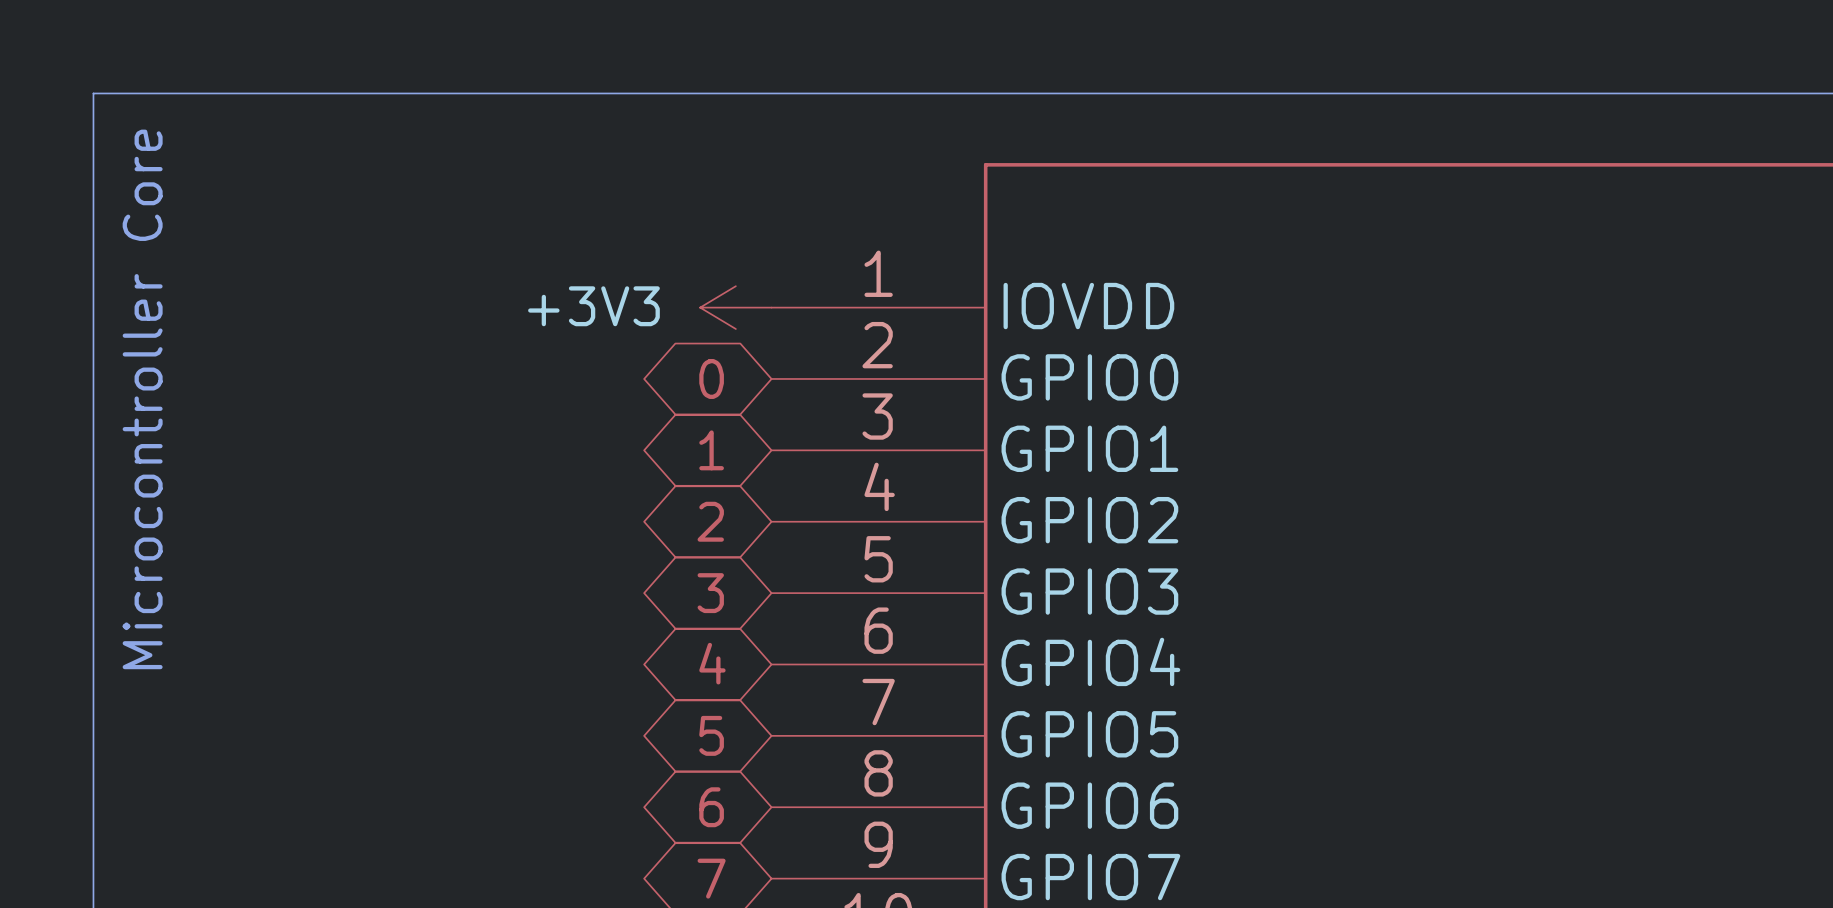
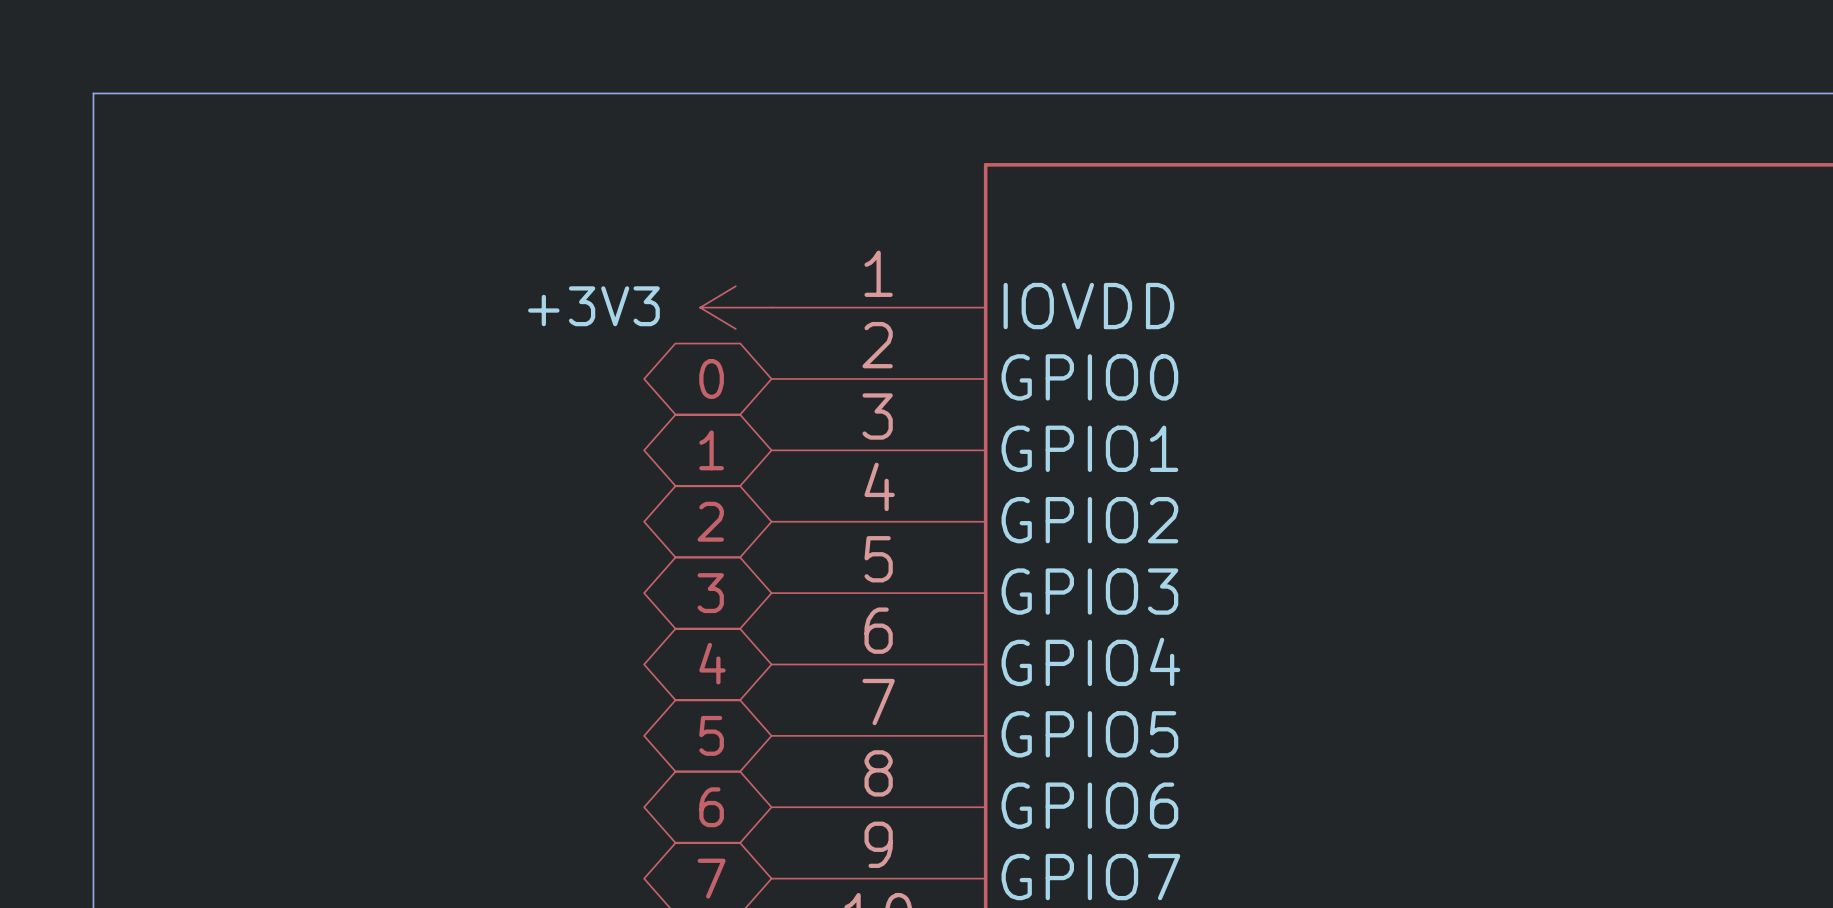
text: Microcontroller Core (142, 399) -> none

